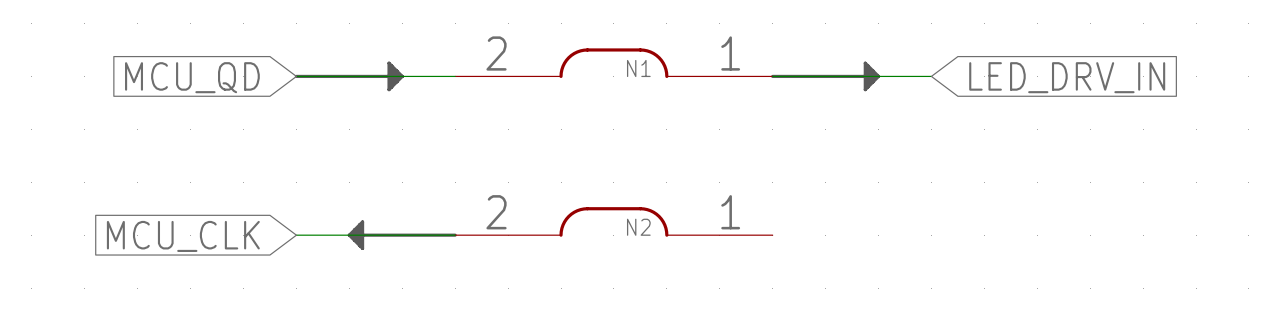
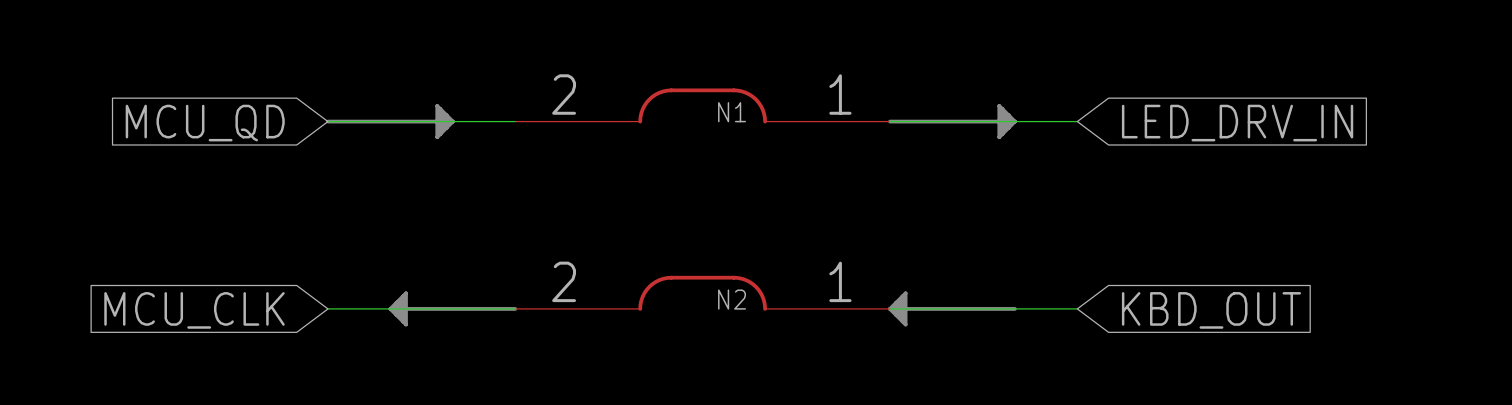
wire: none -> (890, 308) (1077, 308)
part: none -> (952, 308)
global label: none -> KBD_OUT (1211, 310)

